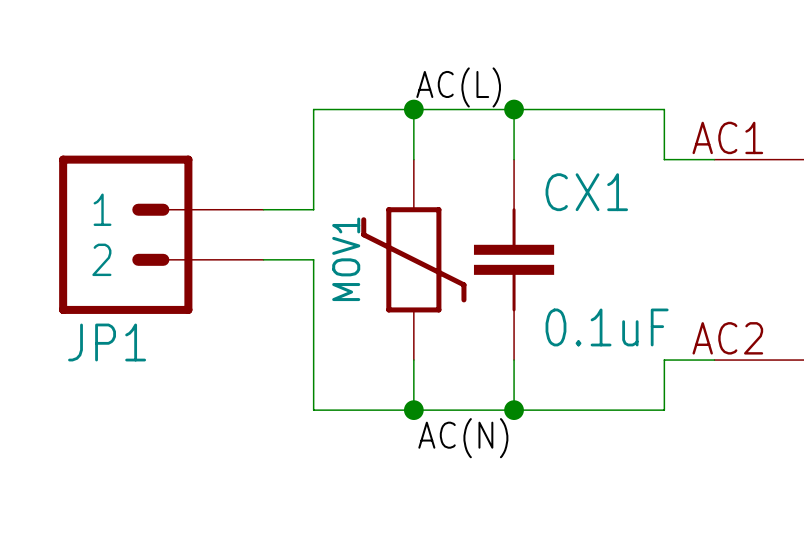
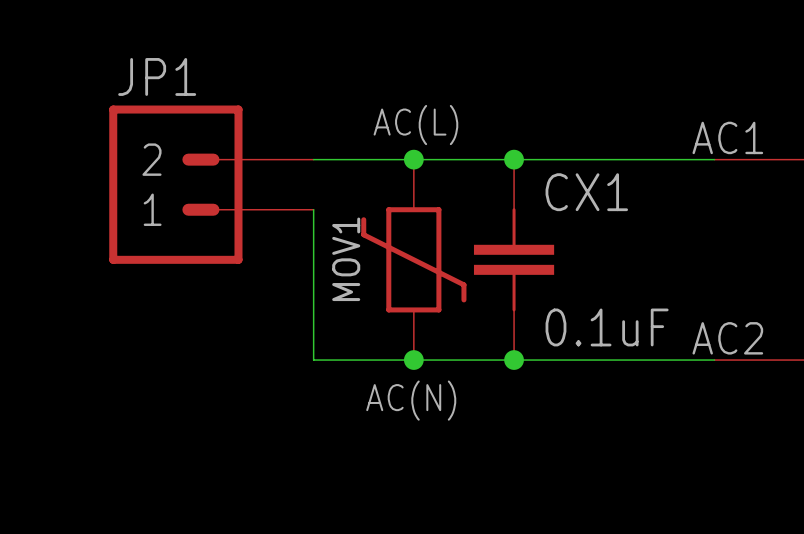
label position: AC(L) (458, 87) -> AC(L) (415, 125)
wire: (413, 109) (413, 159) -> none
junction position: (413, 109) -> (413, 159)
wire: (514, 109) (514, 159) -> none
junction position: (514, 109) -> (514, 159)
wire: (664, 159) (664, 109) (313, 109) (313, 209) (263, 209) -> (664, 159) (313, 159)
JP1 flip: as is (125, 234) -> up-down (175, 184)
wire: (263, 259) (313, 259) -> (313, 209) (313, 259)
wire: (313, 360) (313, 410) (664, 410) (664, 360) -> (313, 360) (664, 360)
wire: (413, 360) (413, 410) -> none
wire: (514, 360) (514, 410) -> none
junction position: (413, 410) -> (413, 360)
junction position: (514, 410) -> (514, 360)
label position: AC(N) (463, 438) -> AC(N) (411, 400)

